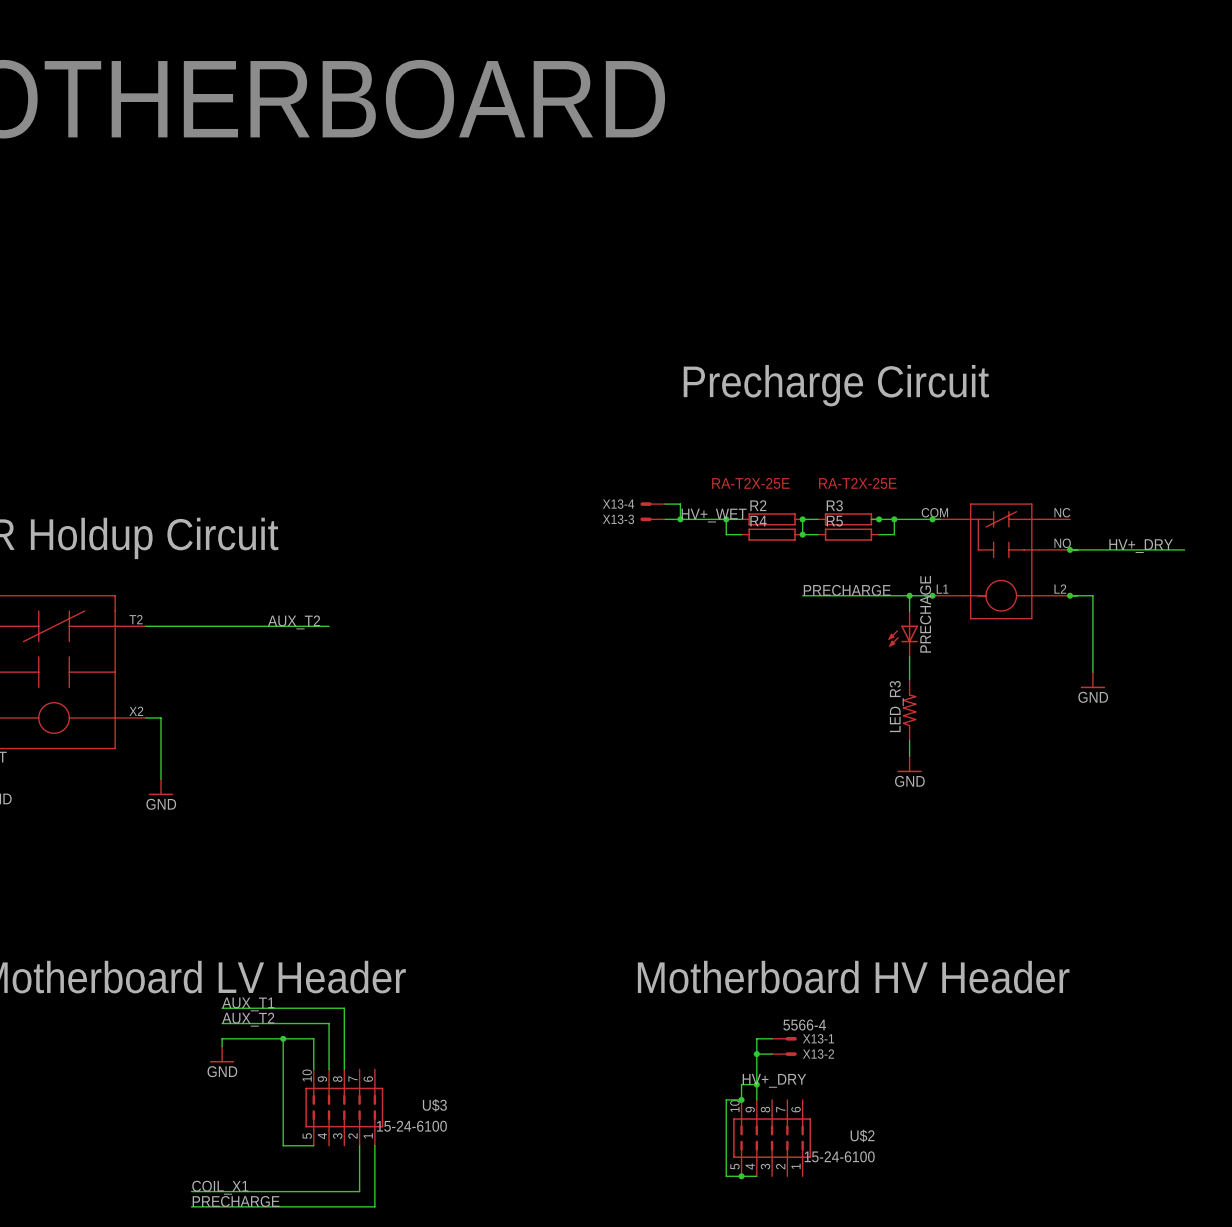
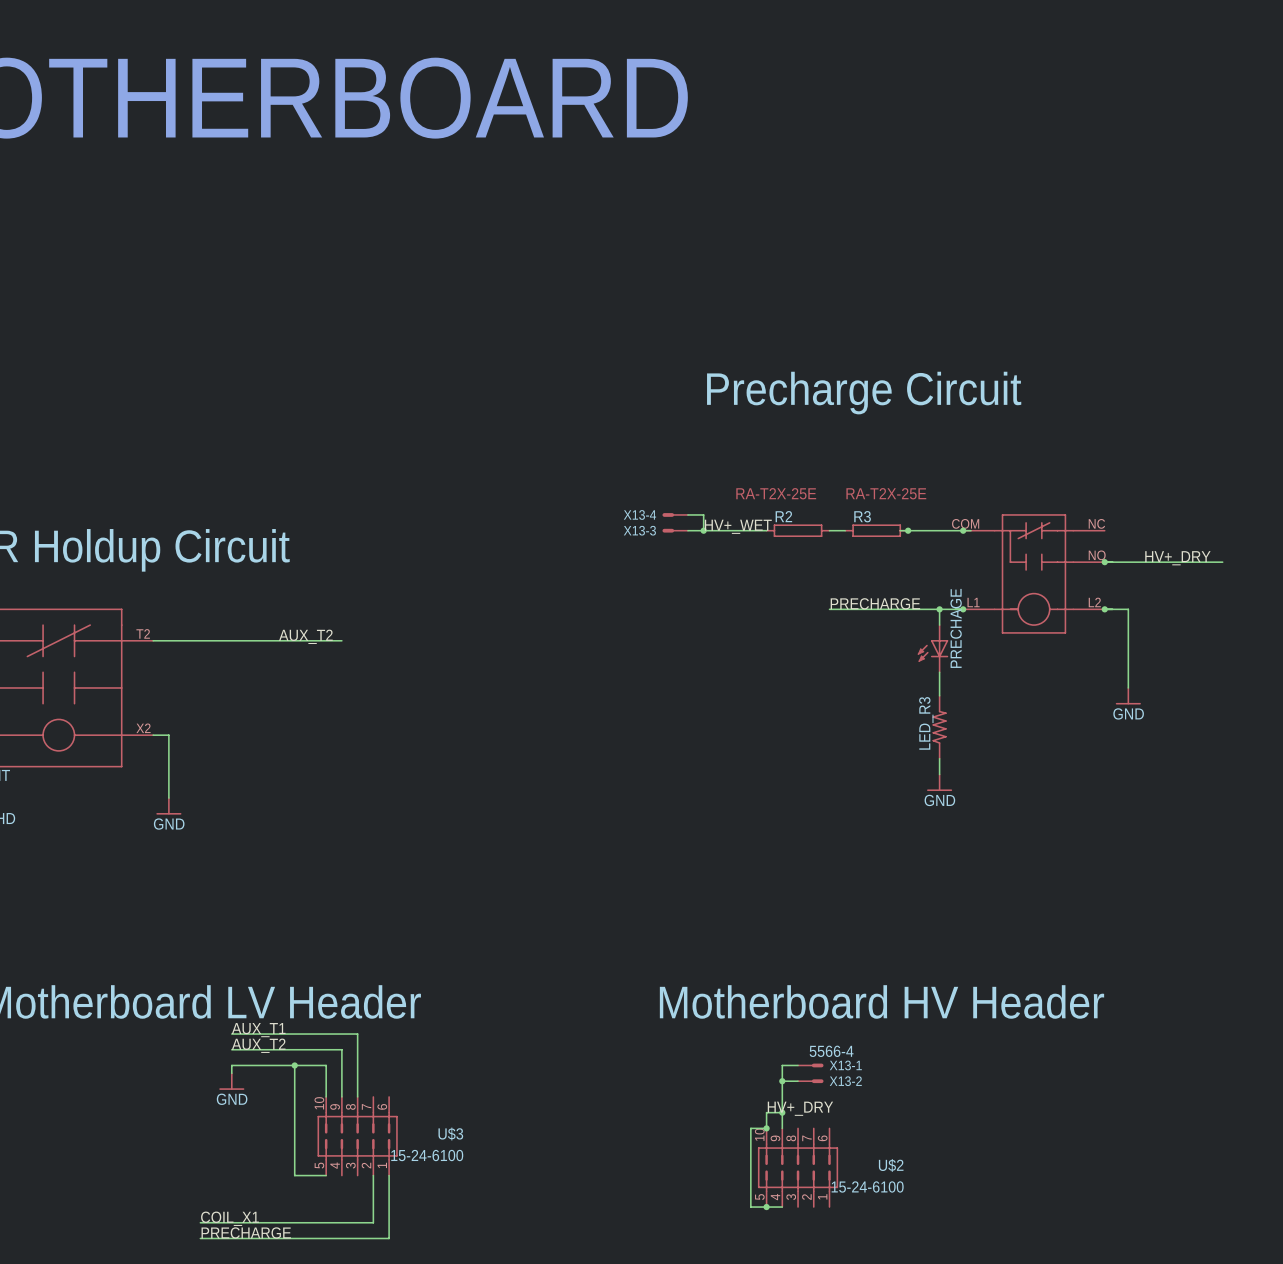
wire: (726, 519) (726, 534) (741, 534) -> none
junction: (726, 519) -> none
wire: (802, 519) (802, 534) (817, 534) -> none
junction: (802, 519) -> none
wire: (894, 519) (894, 534) (879, 534) -> none
junction: (894, 519) -> none
R4: (772, 534) -> none
junction: (802, 534) -> none
R5: (848, 534) -> none

